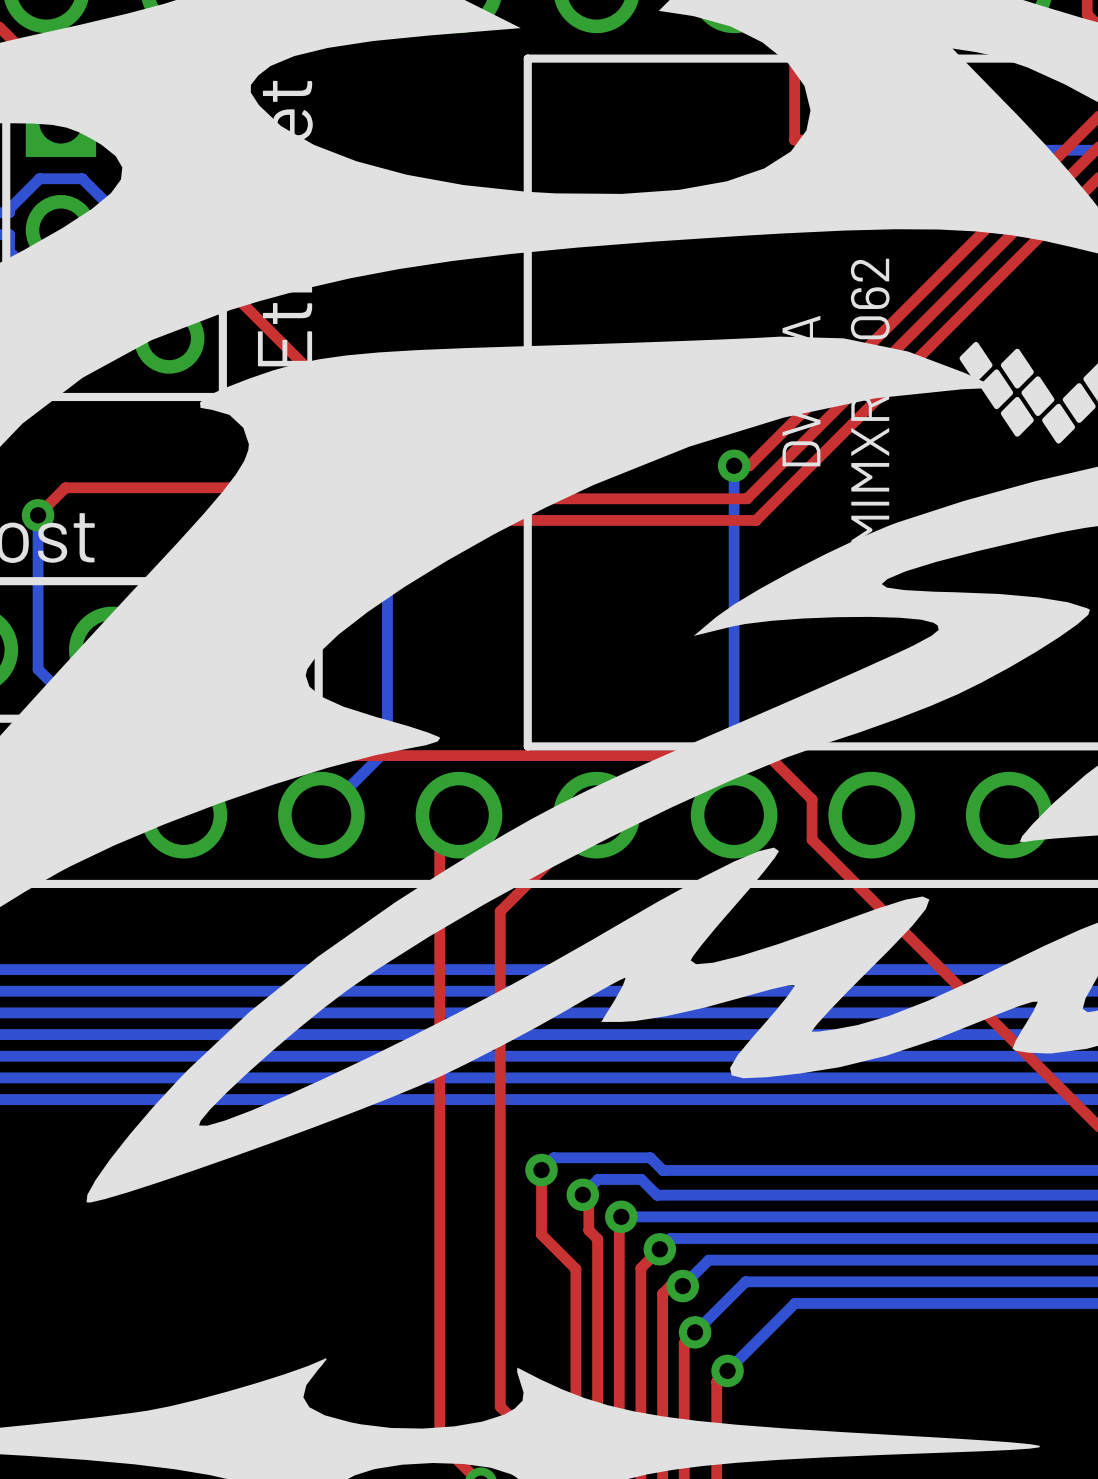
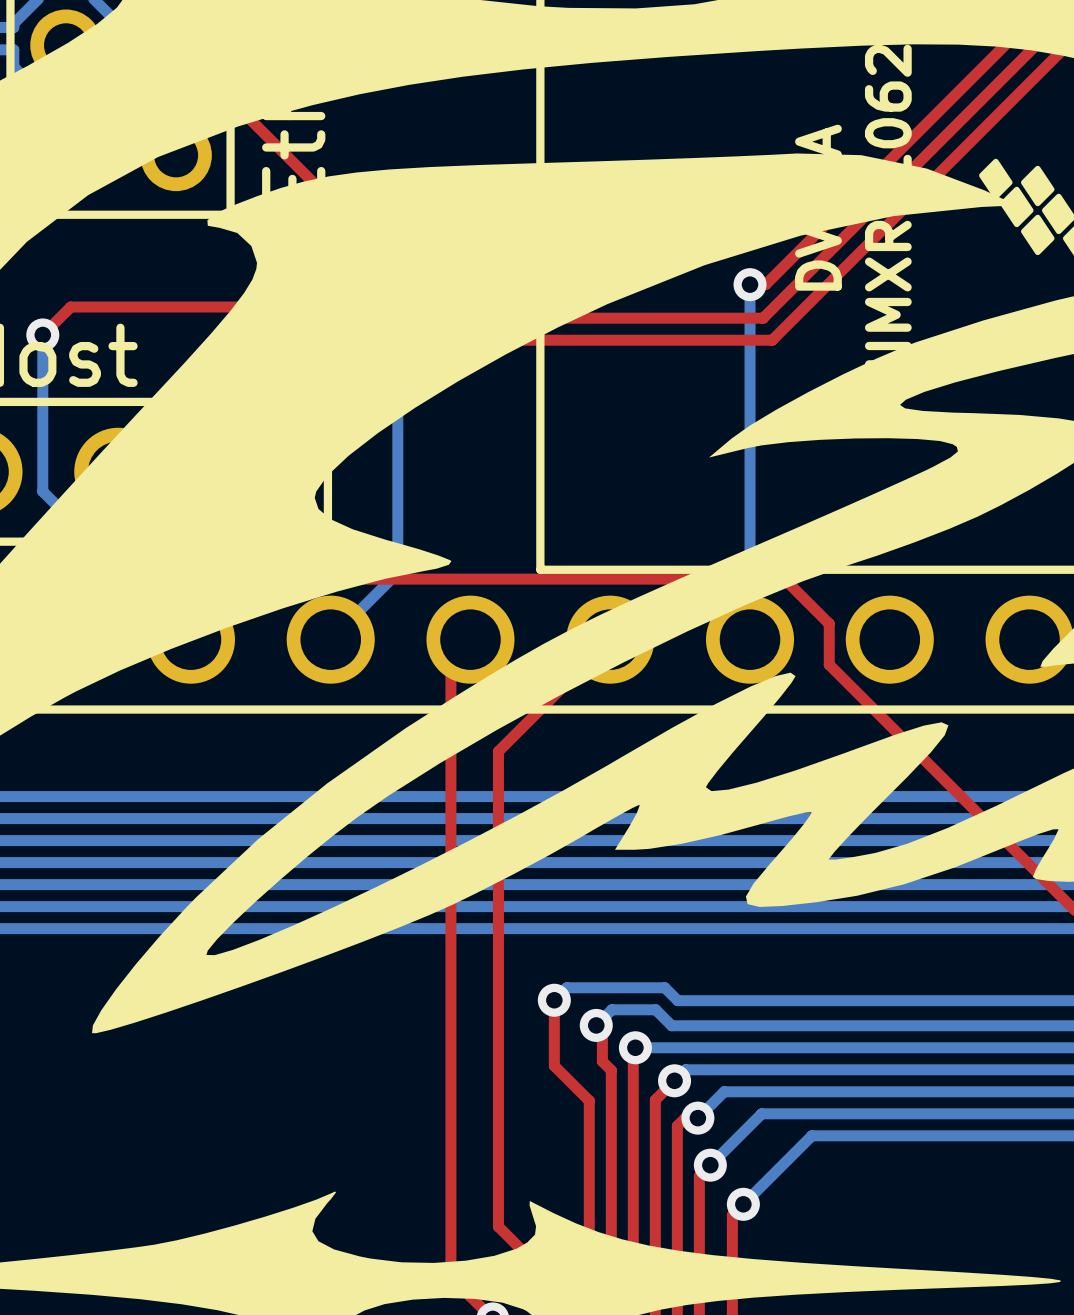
top track: (500, 911) (500, 1406) -> (512, 737) (498, 751) (498, 1226) (512, 1240)

